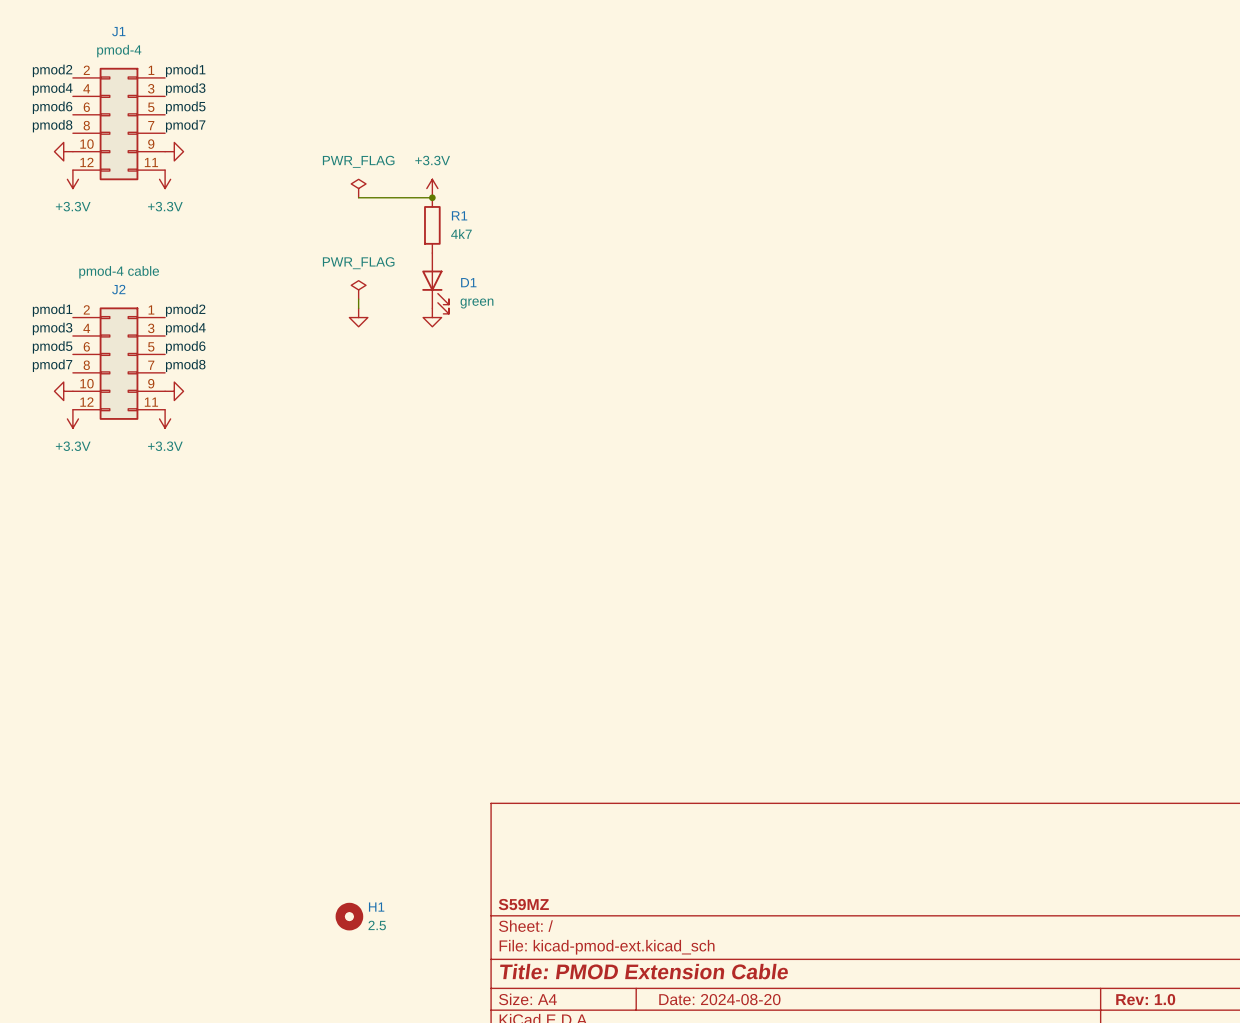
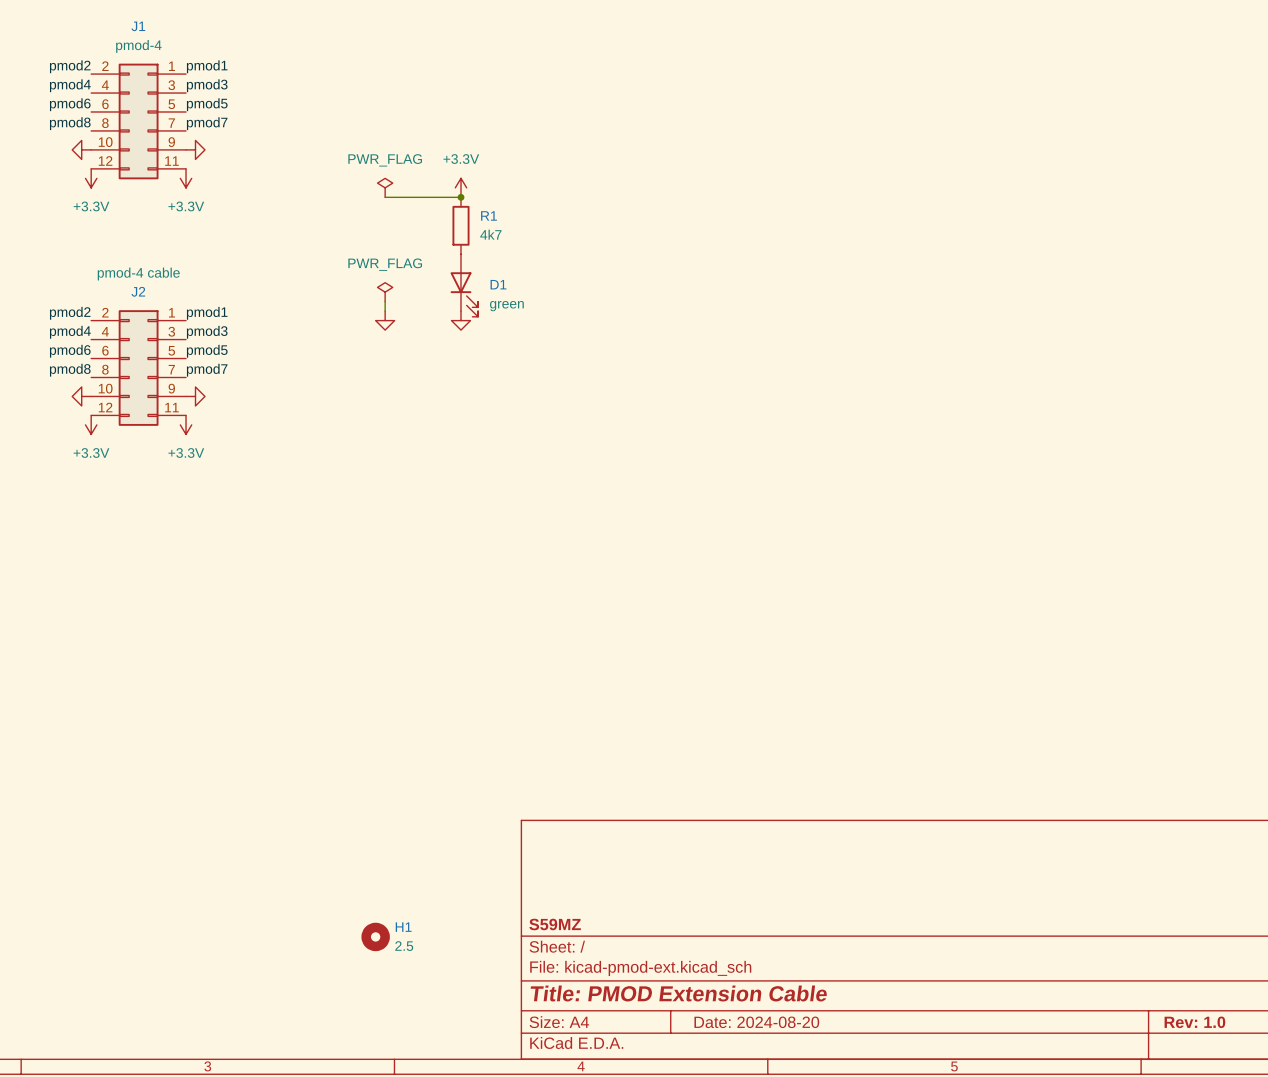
label: pmod1 (52, 310) -> pmod2 (70, 313)
label: pmod2 (185, 310) -> pmod1 (207, 313)
label: pmod3 (52, 328) -> pmod4 (70, 332)
label: pmod4 (185, 328) -> pmod3 (207, 332)
label: pmod5 (52, 347) -> pmod6 (70, 351)
label: pmod6 (185, 347) -> pmod5 (207, 351)
label: pmod7 (52, 365) -> pmod8 (70, 370)
label: pmod8 (185, 365) -> pmod7 (207, 370)

